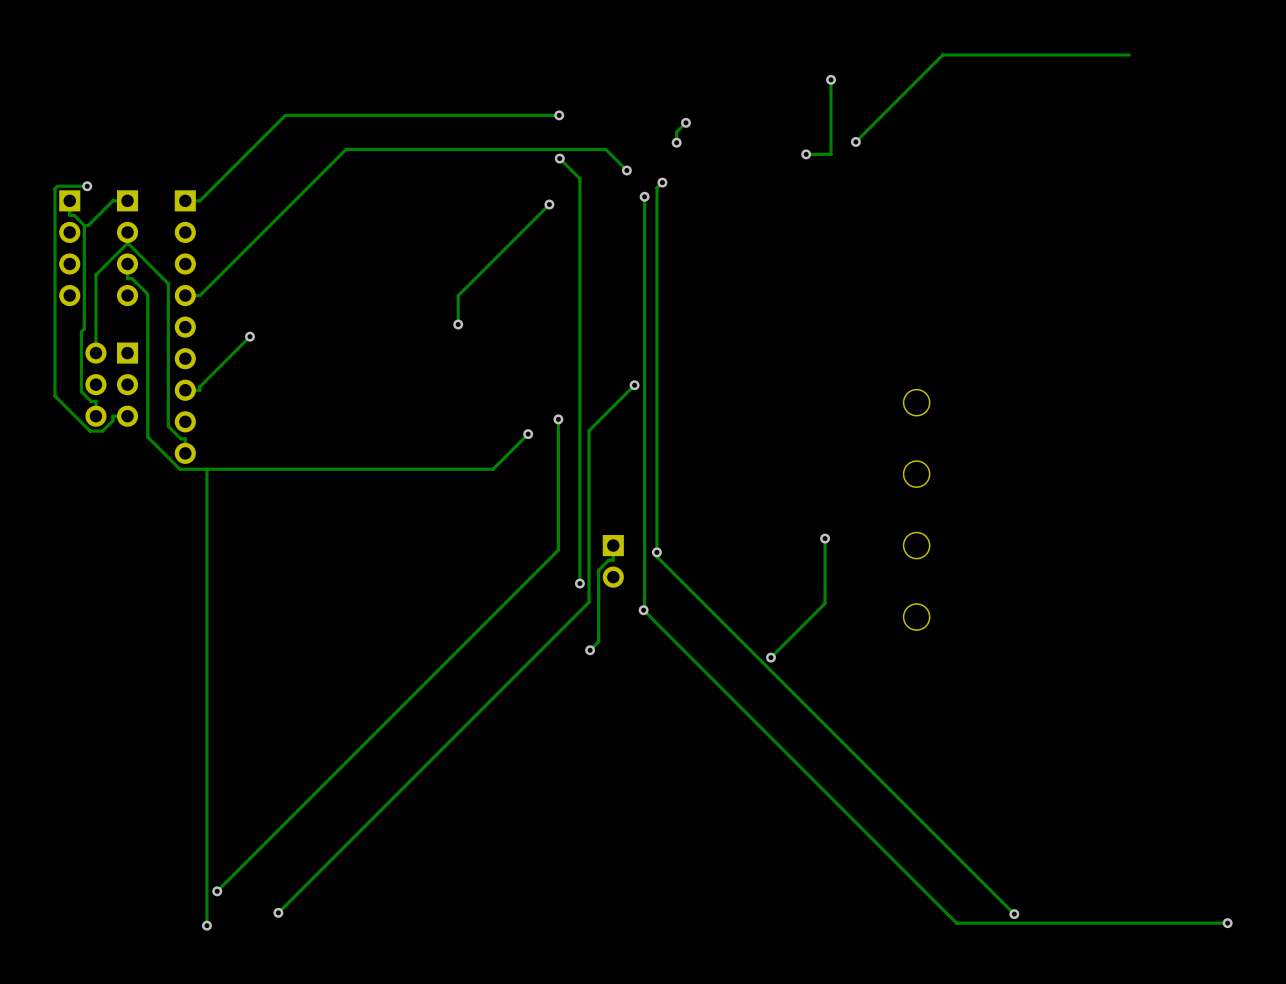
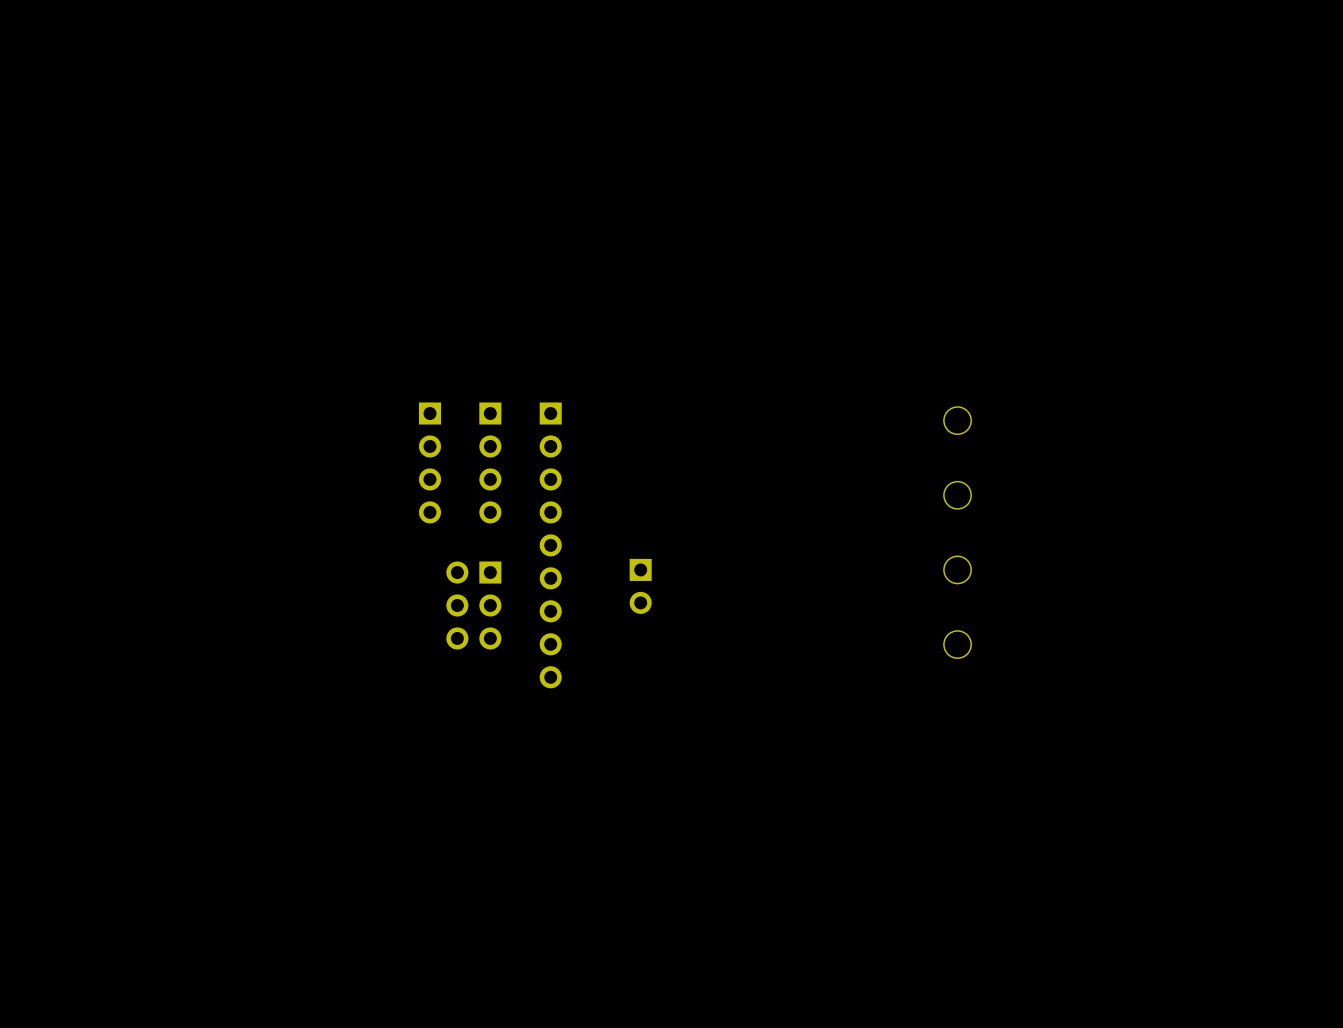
track: (1129, 54) (942, 54) (855, 141) -> none
track: (831, 79) (831, 154) (806, 154) -> none
via: (831, 79) -> none
track: (559, 115) (285, 115) (199, 200) (185, 200) -> none
via: (559, 115) -> none
track: (685, 122) (676, 132) (676, 142) -> none
via: (685, 122) -> none
via: (855, 141) -> none
via: (676, 142) -> none
via: (806, 154) -> none
track: (559, 158) (579, 178) (579, 583) -> none
via: (559, 158) -> none
track: (626, 170) (605, 149) (346, 149) (199, 295) (185, 295) -> none
via: (626, 170) -> none
track: (662, 182) (656, 188) (656, 556) (1014, 914) -> none
via: (662, 182) -> none
track: (87, 186) (57, 186) (54, 188) (54, 396) (90, 431) (102, 431) (112, 420) (112, 416) (127, 416) -> none
via: (87, 186) -> none
track: (644, 196) (643, 610) (956, 923) (1227, 923) -> none
via: (644, 196) -> none
track: (69, 200) (69, 215) (74, 215) (84, 225) -> none
track: (127, 200) (112, 200) (88, 225) (84, 225) -> none
track: (549, 204) (458, 295) (458, 324) -> none
via: (549, 204) -> none
track: (84, 225) (84, 328) (81, 331) (81, 391) (91, 401) (95, 401) (95, 416) -> none
track: (127, 243) (95, 274) (95, 353) -> none
track: (127, 243) (168, 283) (168, 426) (180, 438) (185, 438) (185, 453) -> none
part: (69, 248) -> none
part: (127, 248) -> none
track: (127, 263) (127, 278) (132, 278) (147, 294) (147, 437) (179, 469) (493, 469) (528, 434) -> none
via: (458, 324) -> none
part: (185, 327) -> none
track: (249, 336) (199, 386) (199, 390) (185, 390) -> none
via: (249, 336) -> none
part: (111, 384) -> none
track: (634, 385) (589, 430) (589, 602) (278, 912) -> none
via: (634, 385) -> none
track: (558, 419) (558, 550) (217, 891) -> none
via: (558, 419) -> none
via: (528, 434) -> none
part: none -> (429, 462)
part: none -> (490, 462)
track: (206, 469) (206, 925) -> none
part: none -> (550, 545)
track: (825, 538) (825, 603) (770, 657) -> none
via: (825, 538) -> none
track: (613, 545) (613, 560) (608, 560) (598, 570) (598, 641) (590, 650) -> none
via: (656, 552) -> none
part: none -> (473, 605)
via: (579, 583) -> none
via: (643, 610) -> none
via: (590, 650) -> none
via: (770, 657) -> none
via: (217, 891) -> none
via: (278, 912) -> none
via: (1014, 914) -> none
via: (1227, 923) -> none
via: (206, 925) -> none

